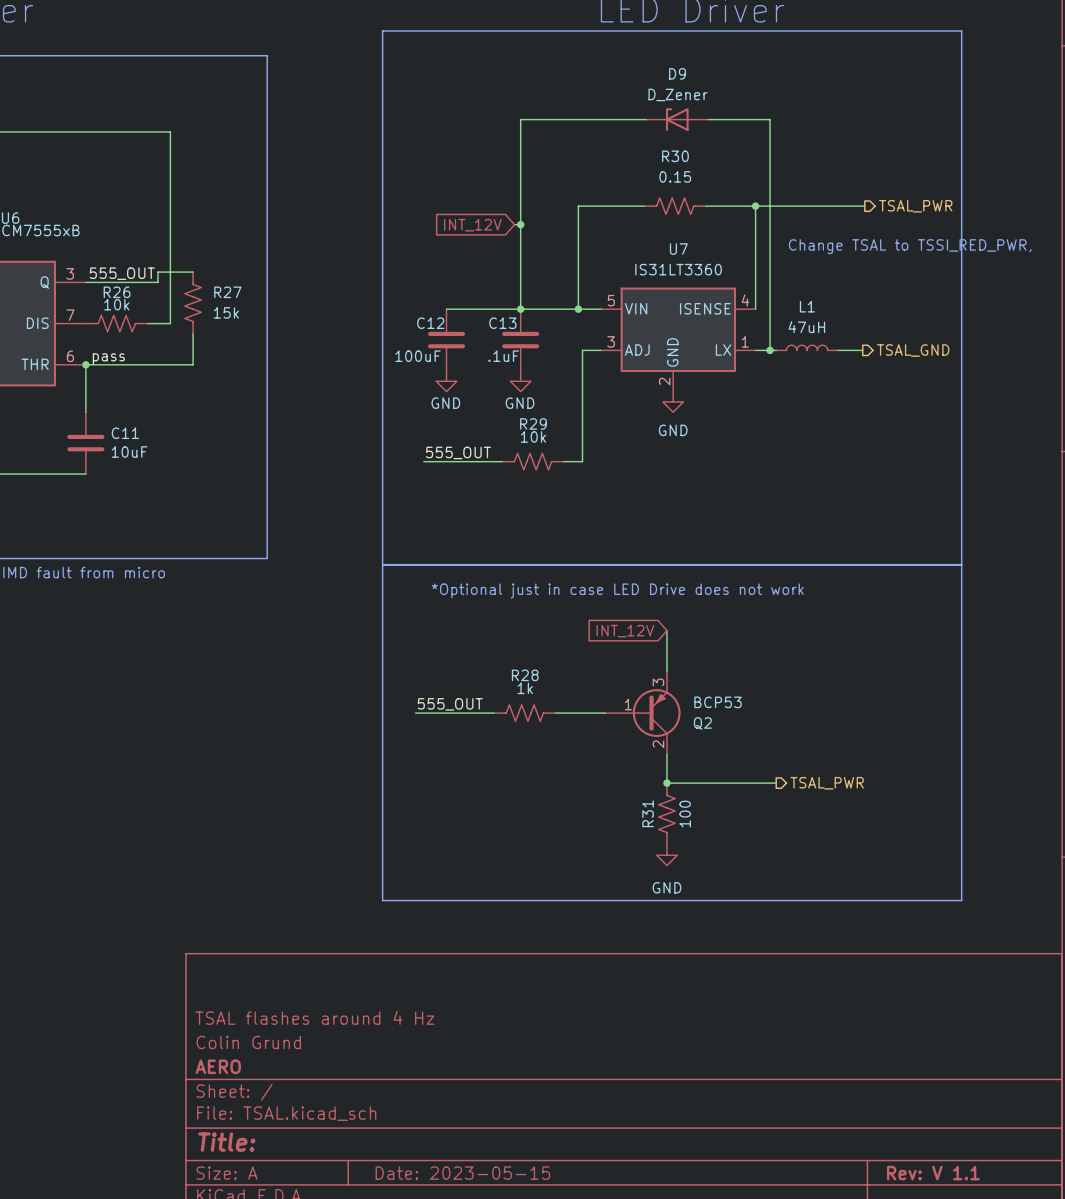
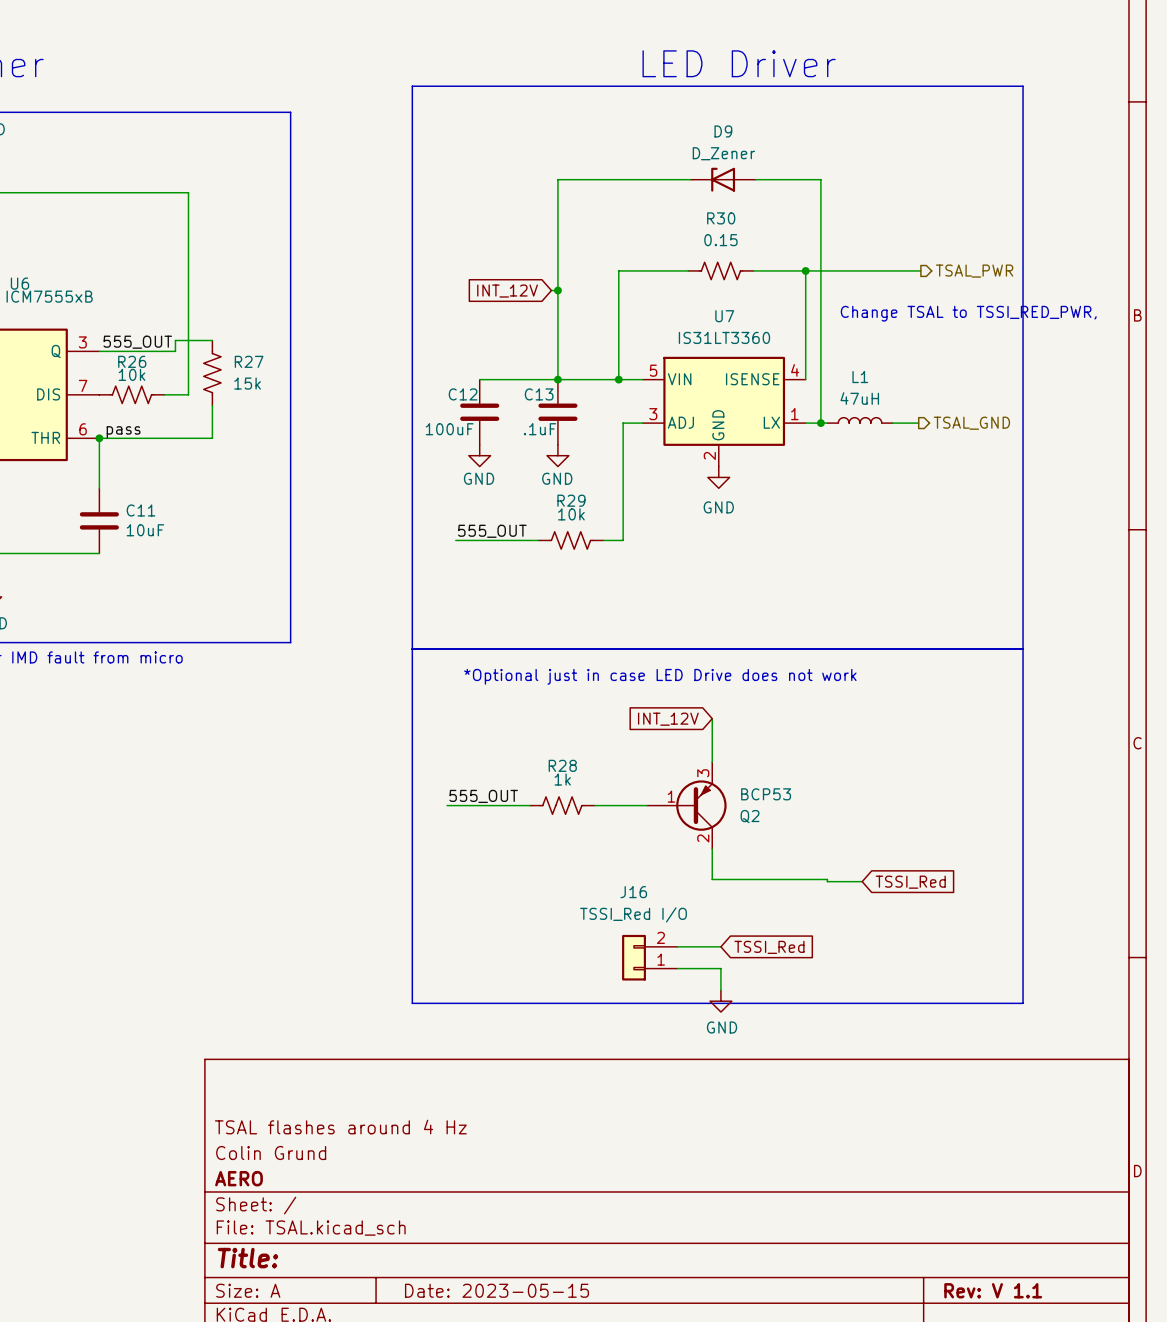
junction: (666, 783) -> none
wire: none -> (827, 879) (827, 881) (862, 881)
hierarchical label: TSAL_PWR (827, 783) -> none
global label: none -> TSSI_Red (910, 882)
R31: 100 (666, 814) -> none
wire: none -> (677, 946) (720, 946)
global label: none -> TSSI_Red (769, 947)
power symbol position: GND (666, 855) -> GND (720, 1001)
J16: none -> TSSI_Red I/O (649, 957)
wire: none -> (677, 968) (720, 968) (720, 990)
power symbol text position: GND (666, 887) -> GND (722, 1027)

